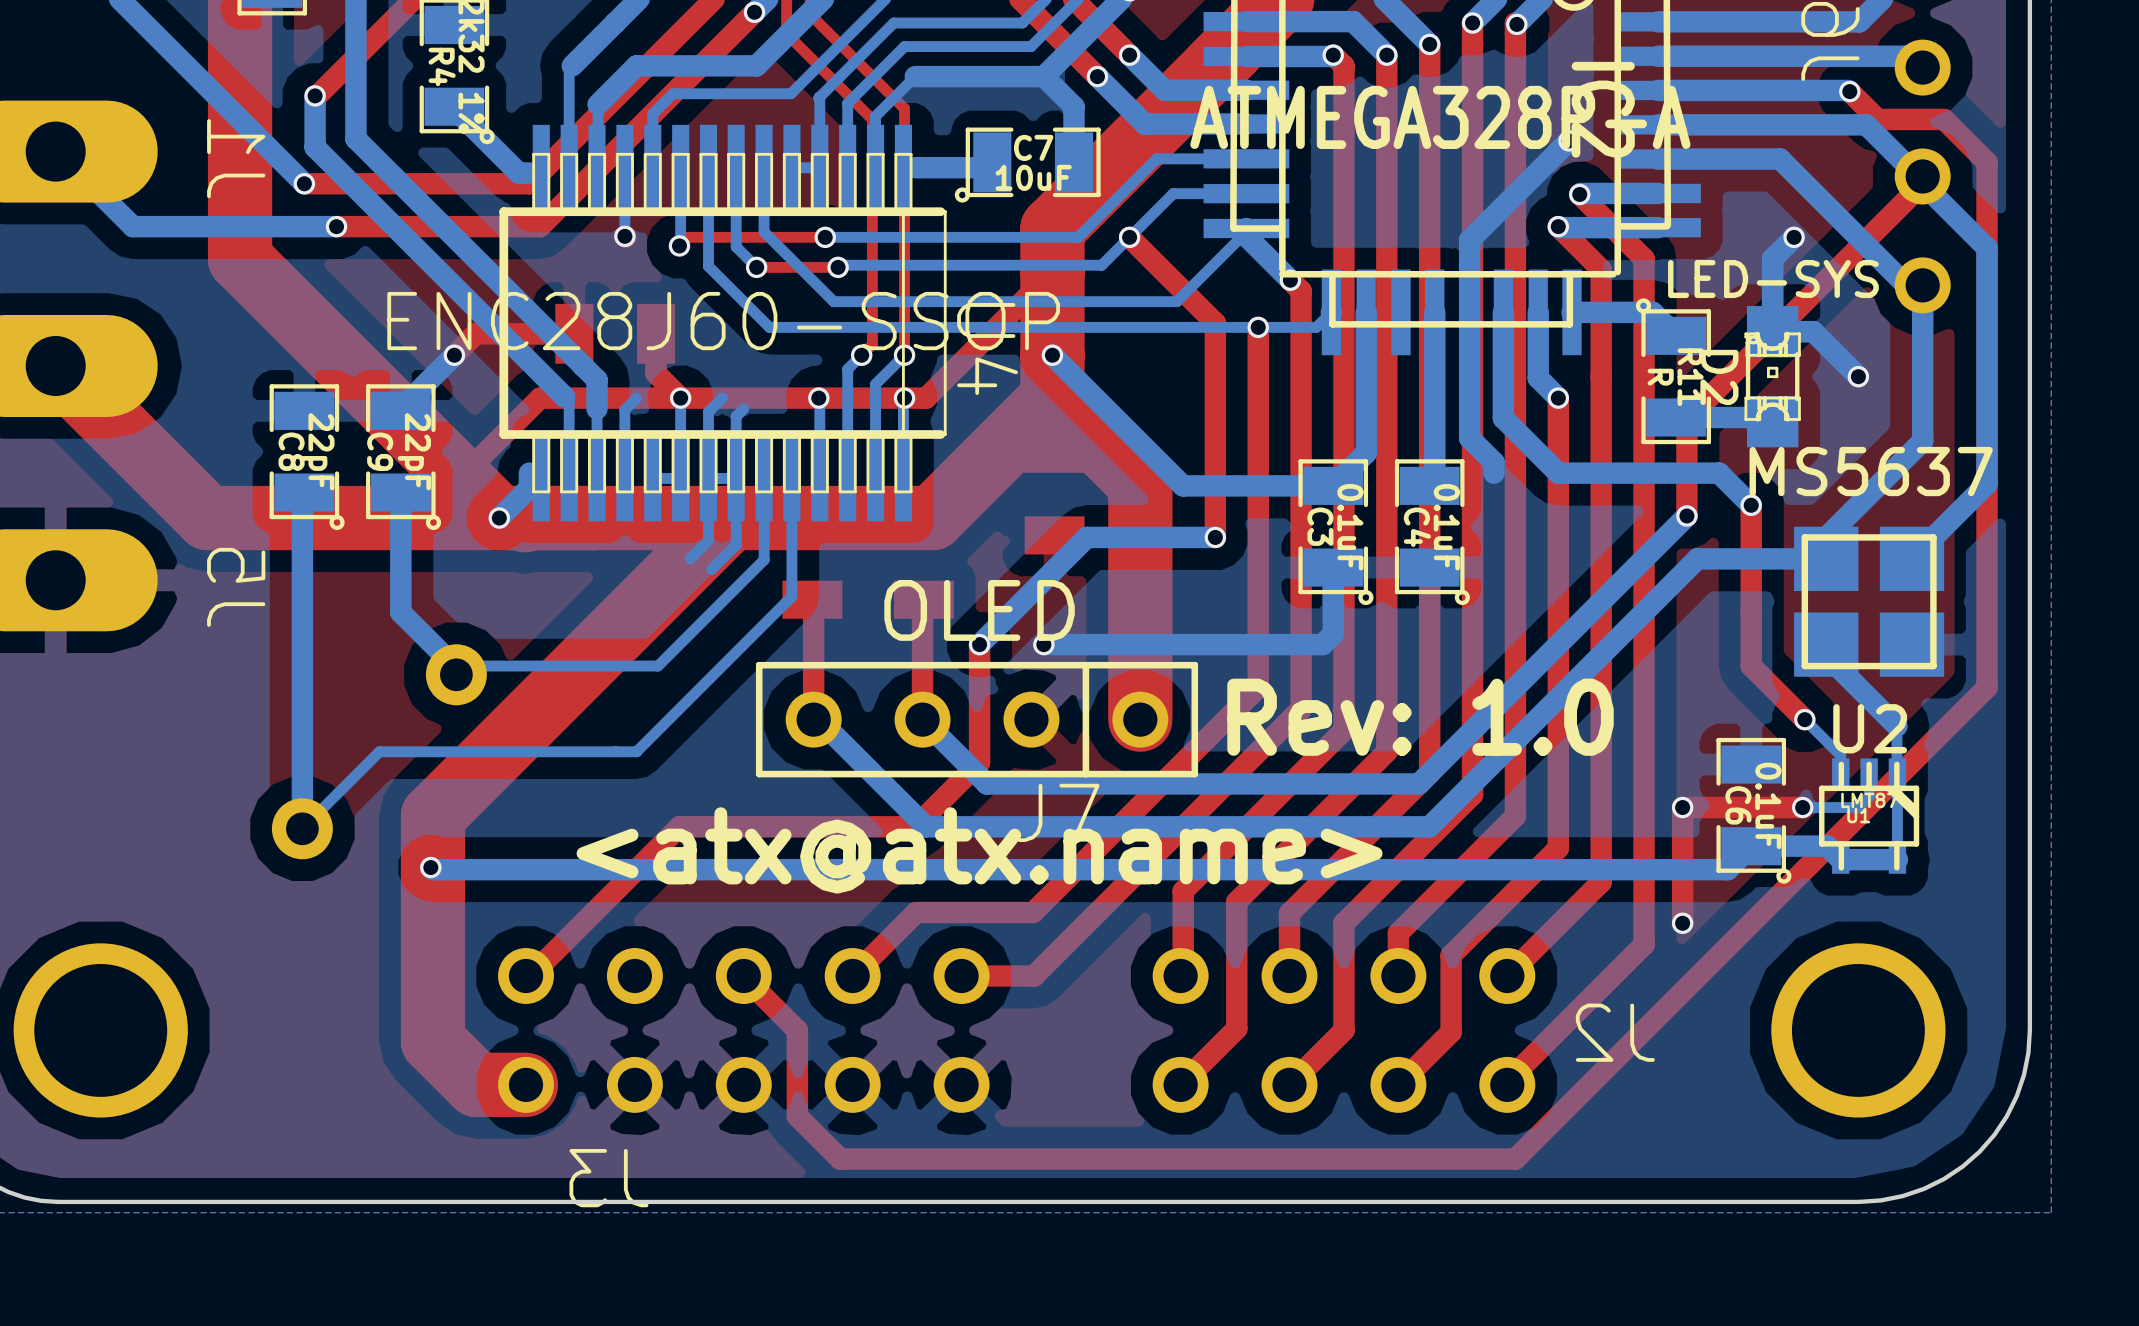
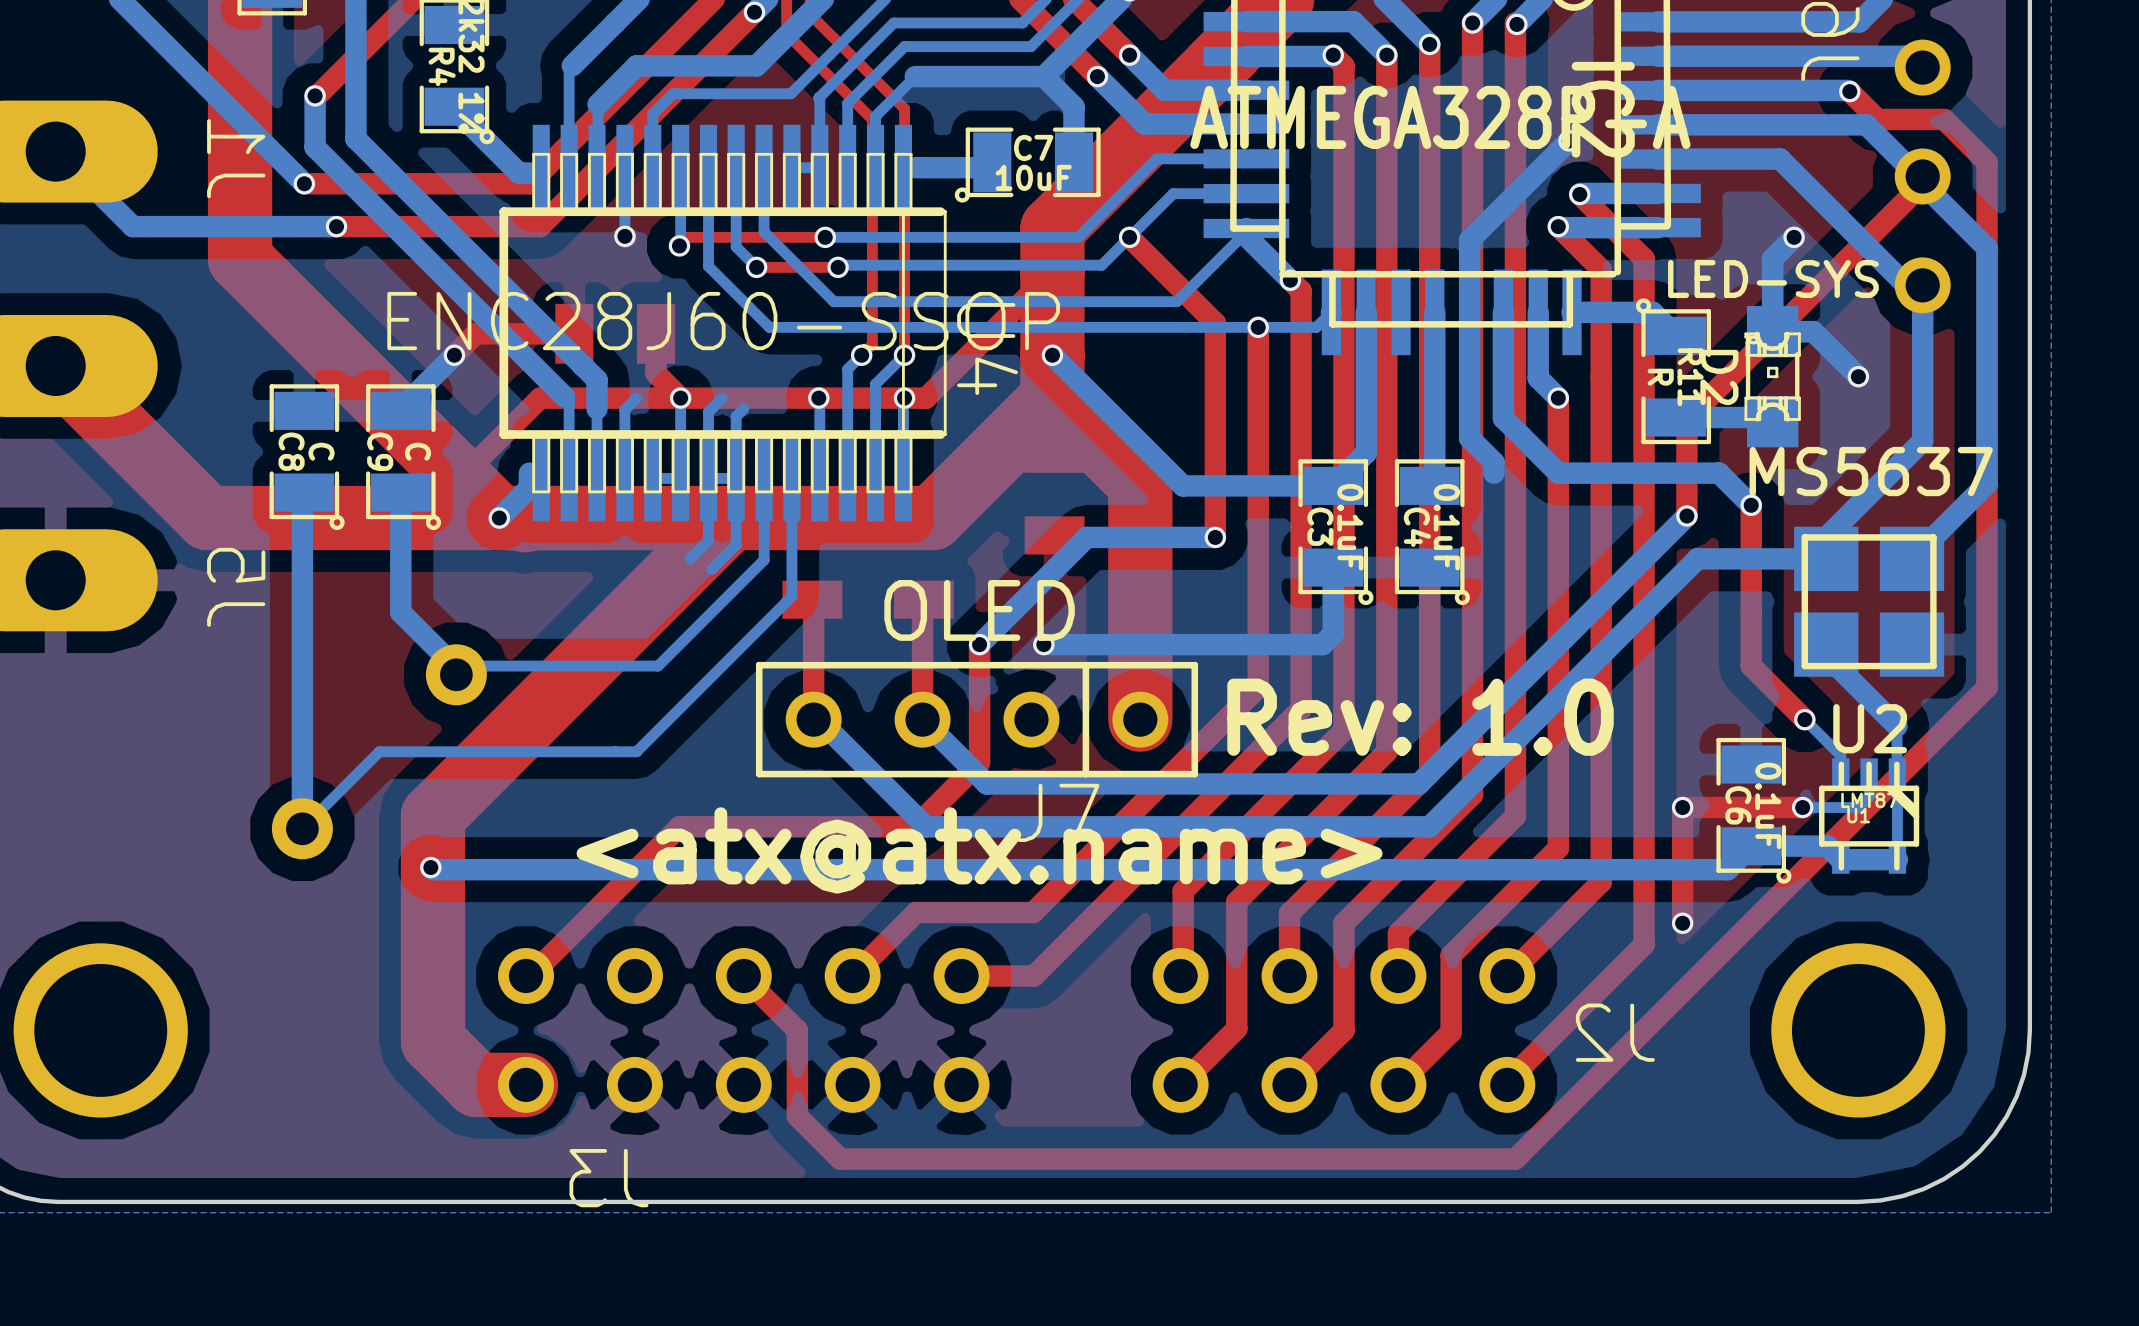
C8 value: 22pF (317, 451) -> C (321, 451)
C9 value: 22pF (414, 451) -> C (417, 451)

